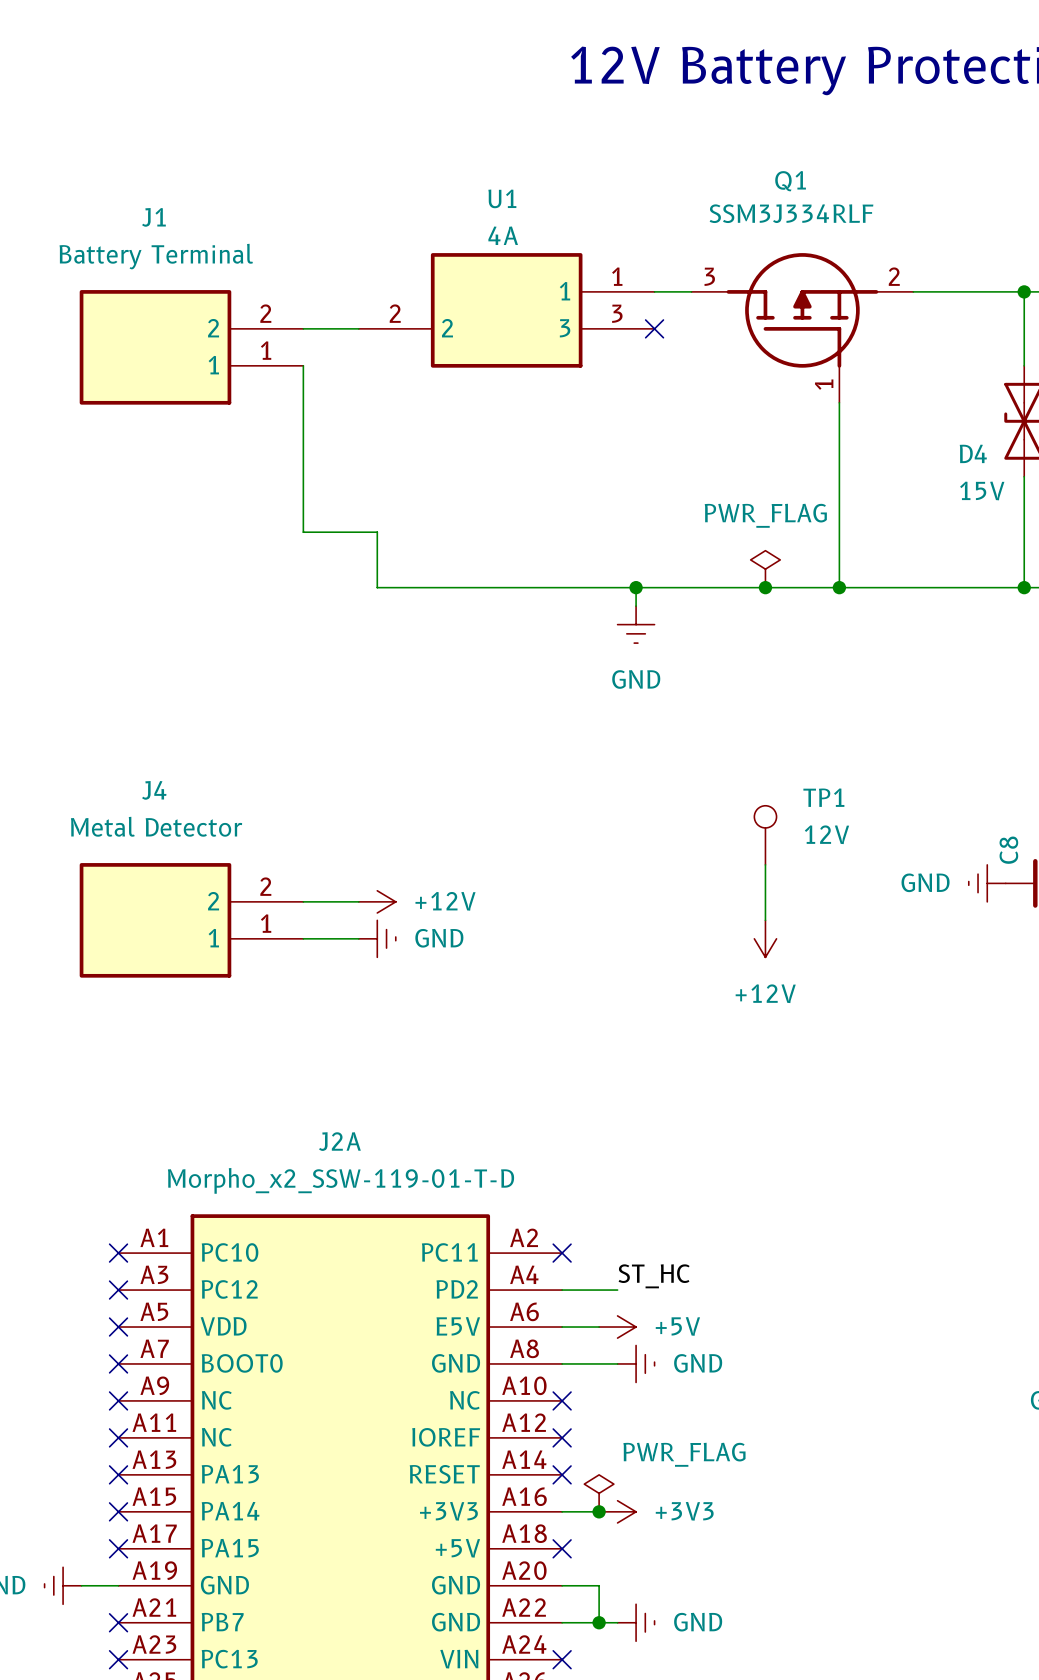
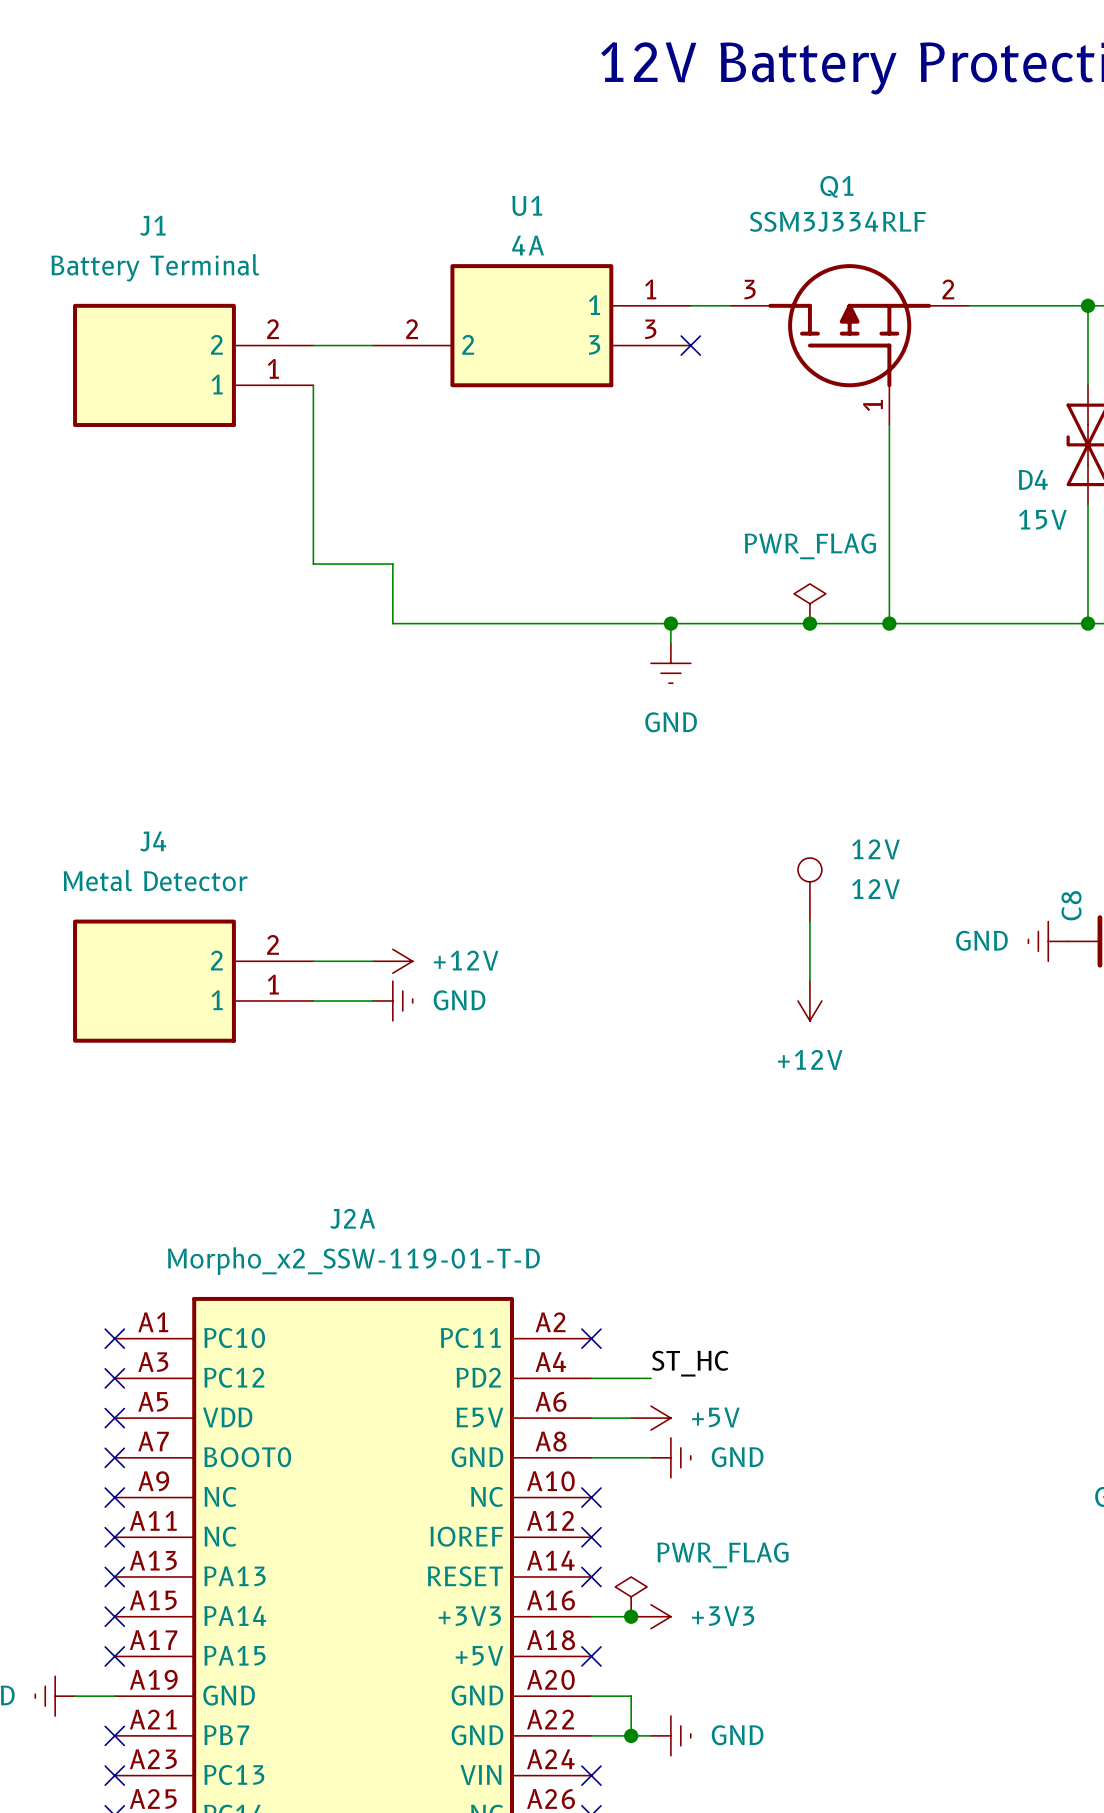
TP1 name: TP1 (823, 797) -> 12V (876, 849)

